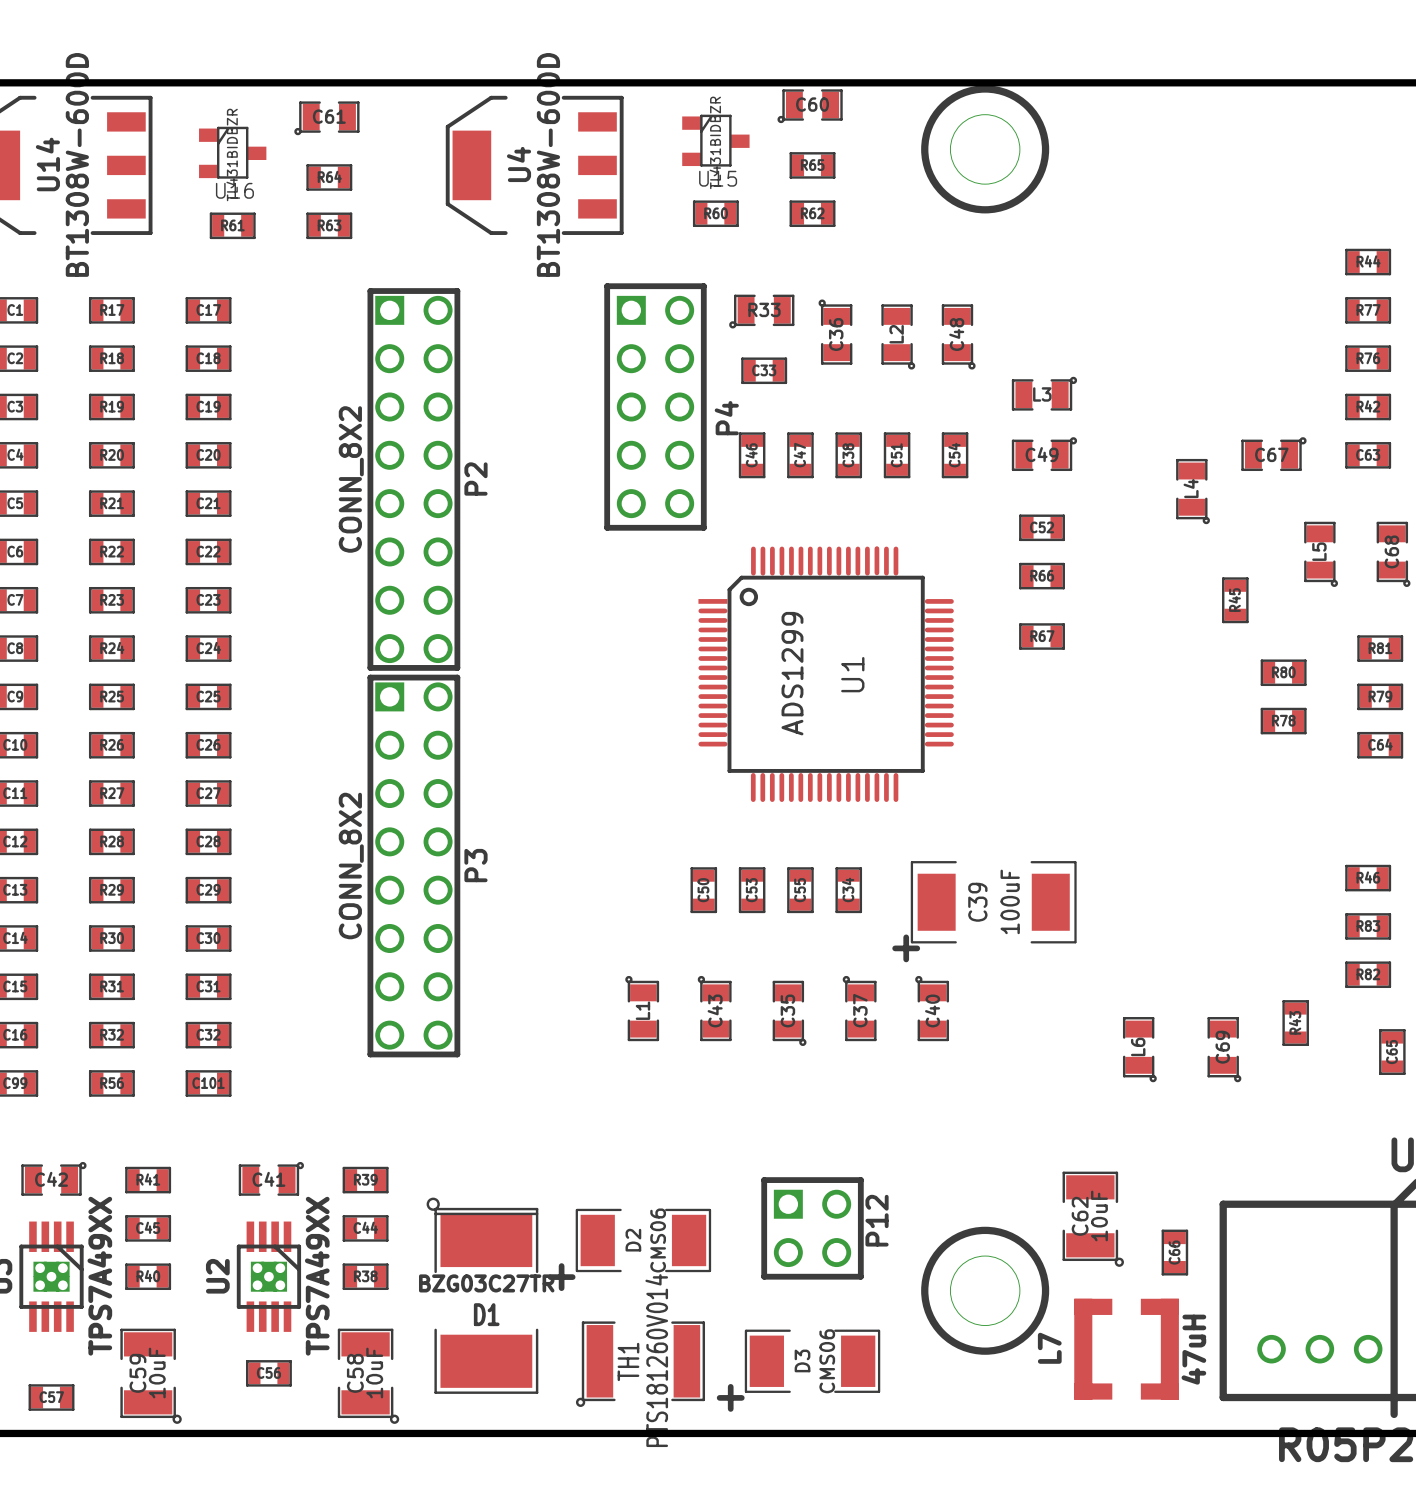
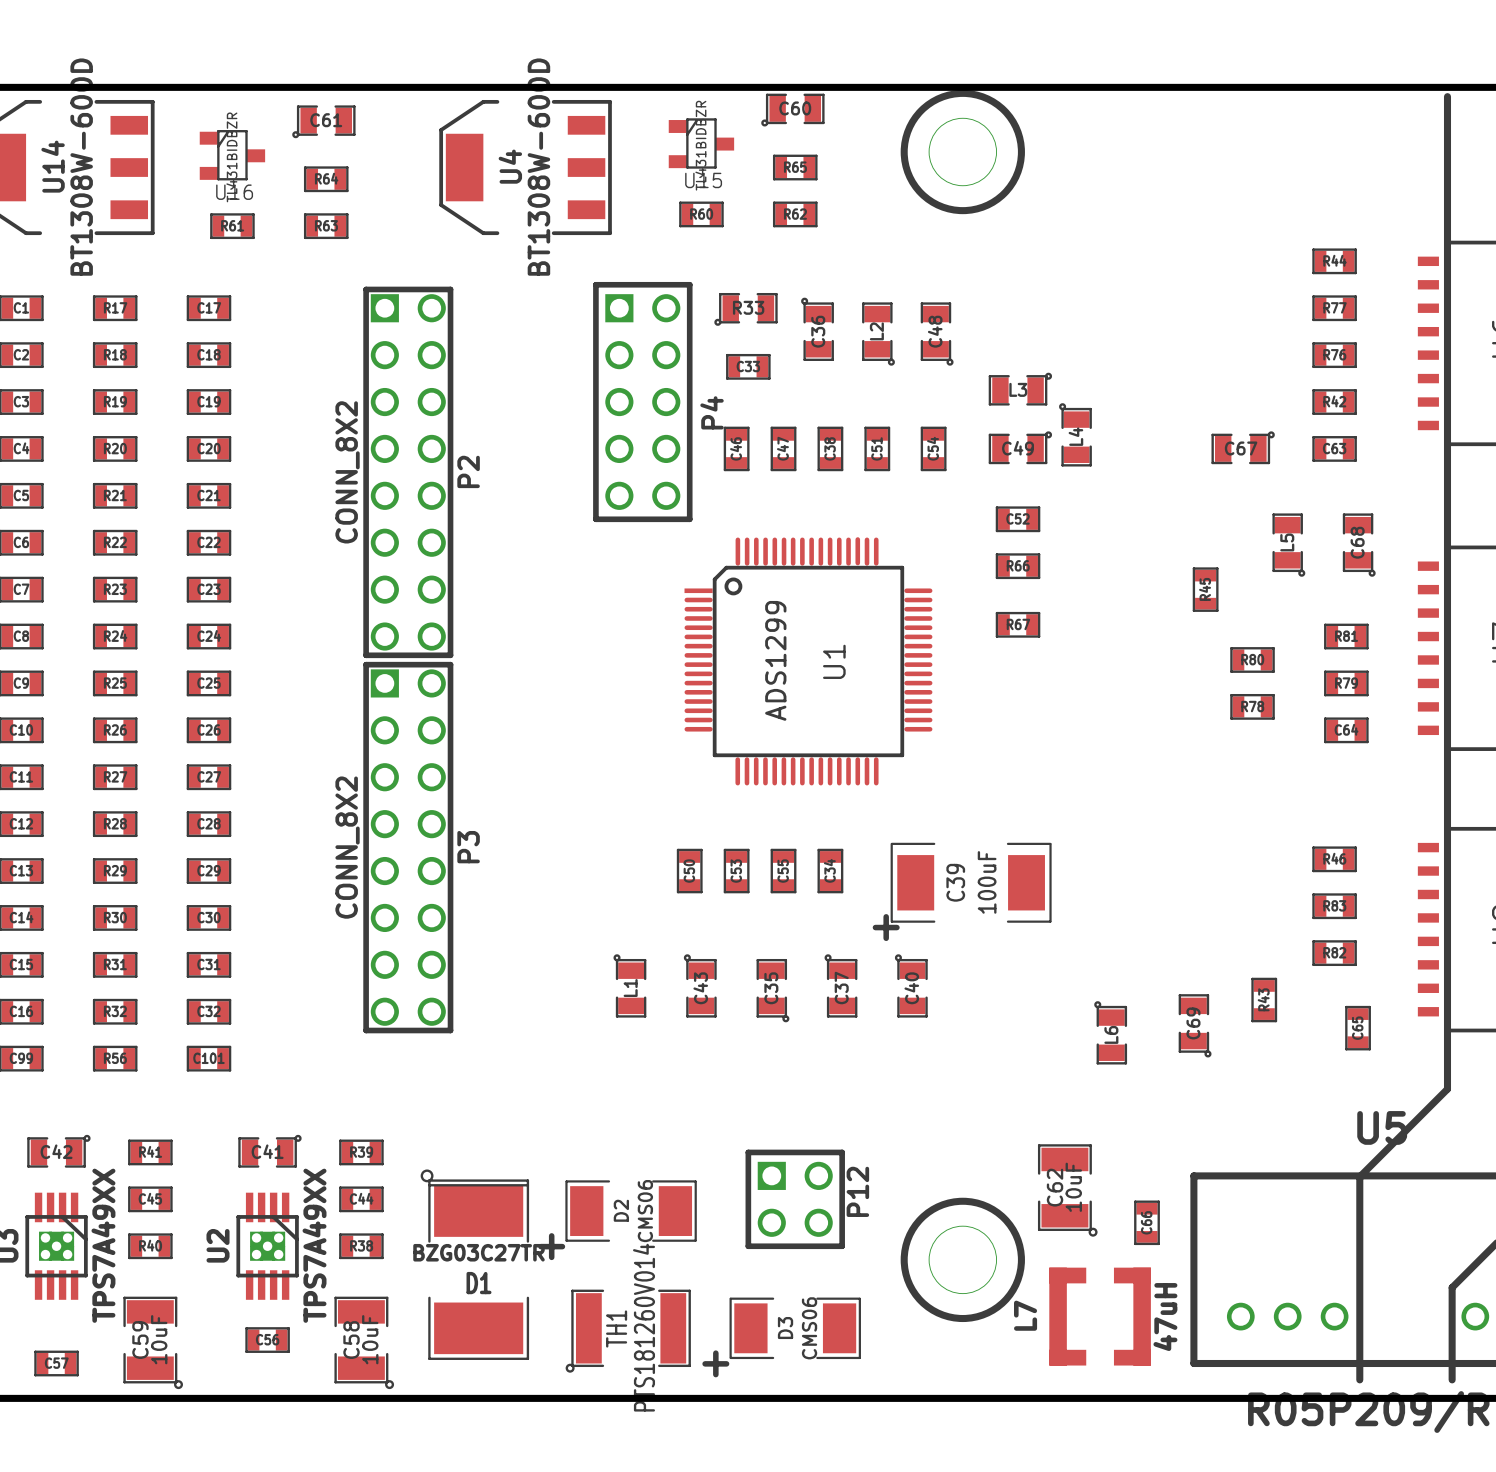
L4 rotation: 0° (1193, 491) -> 180° (1075, 434)
L4 position: (1193, 491) -> (1075, 434)
L6 rotation: 0° (1139, 1049) -> 180° (1110, 1032)

